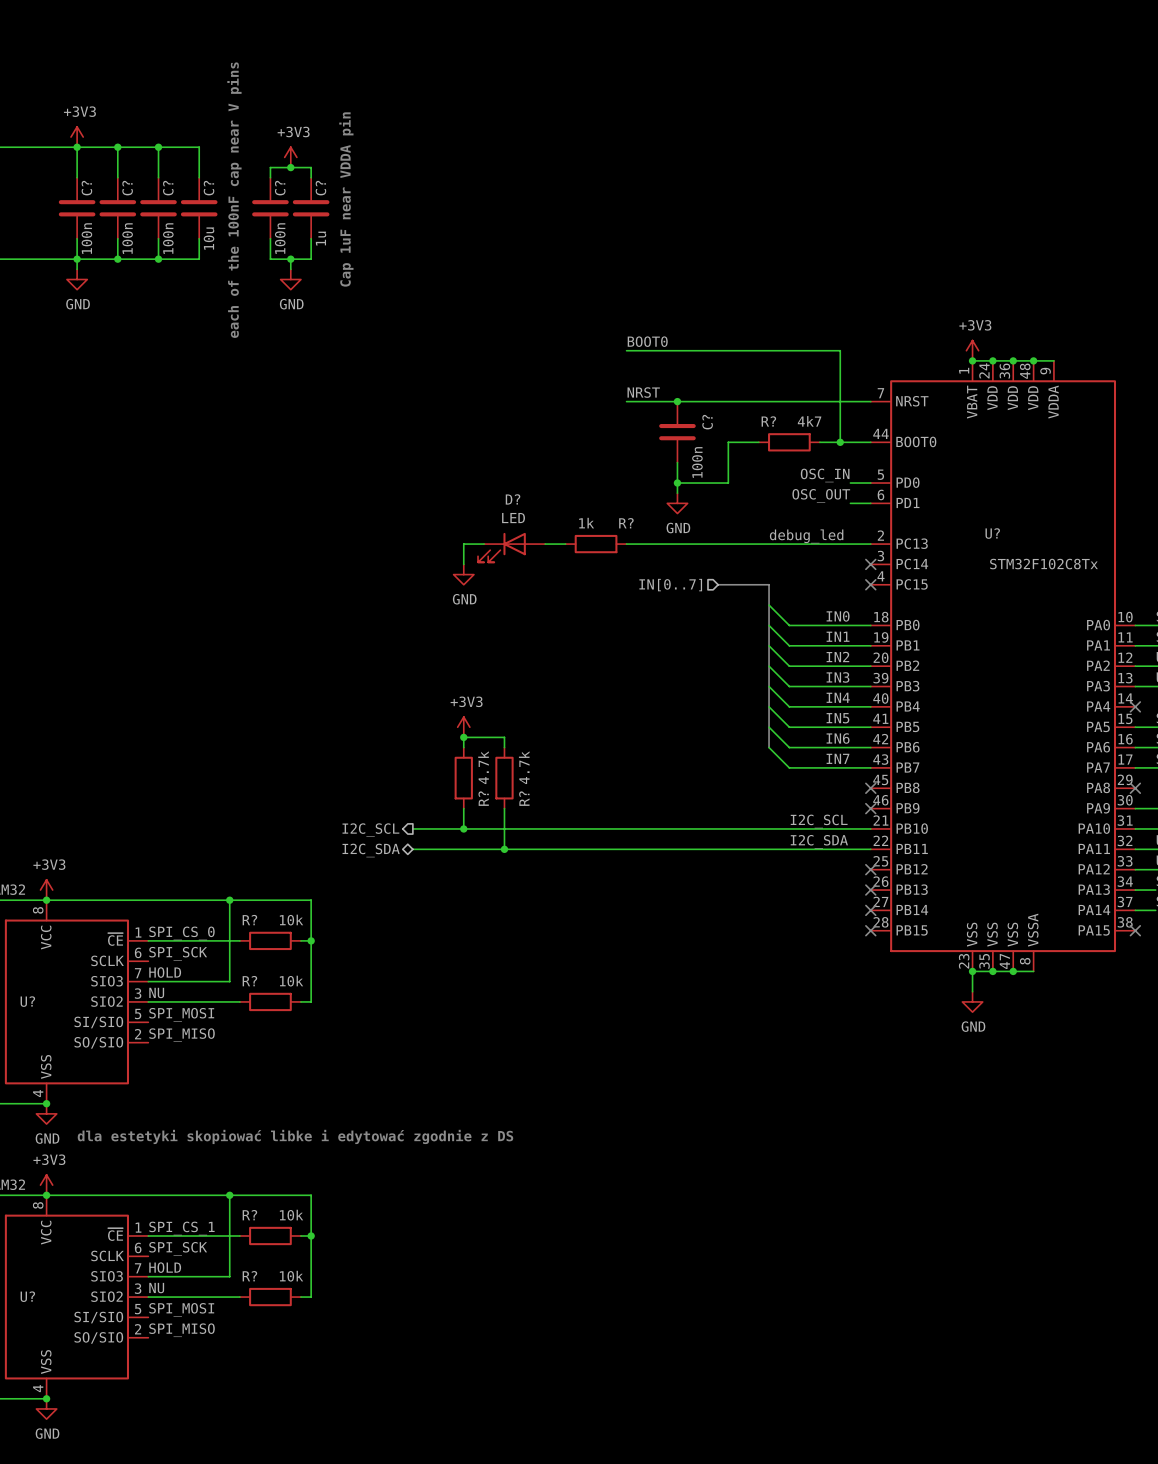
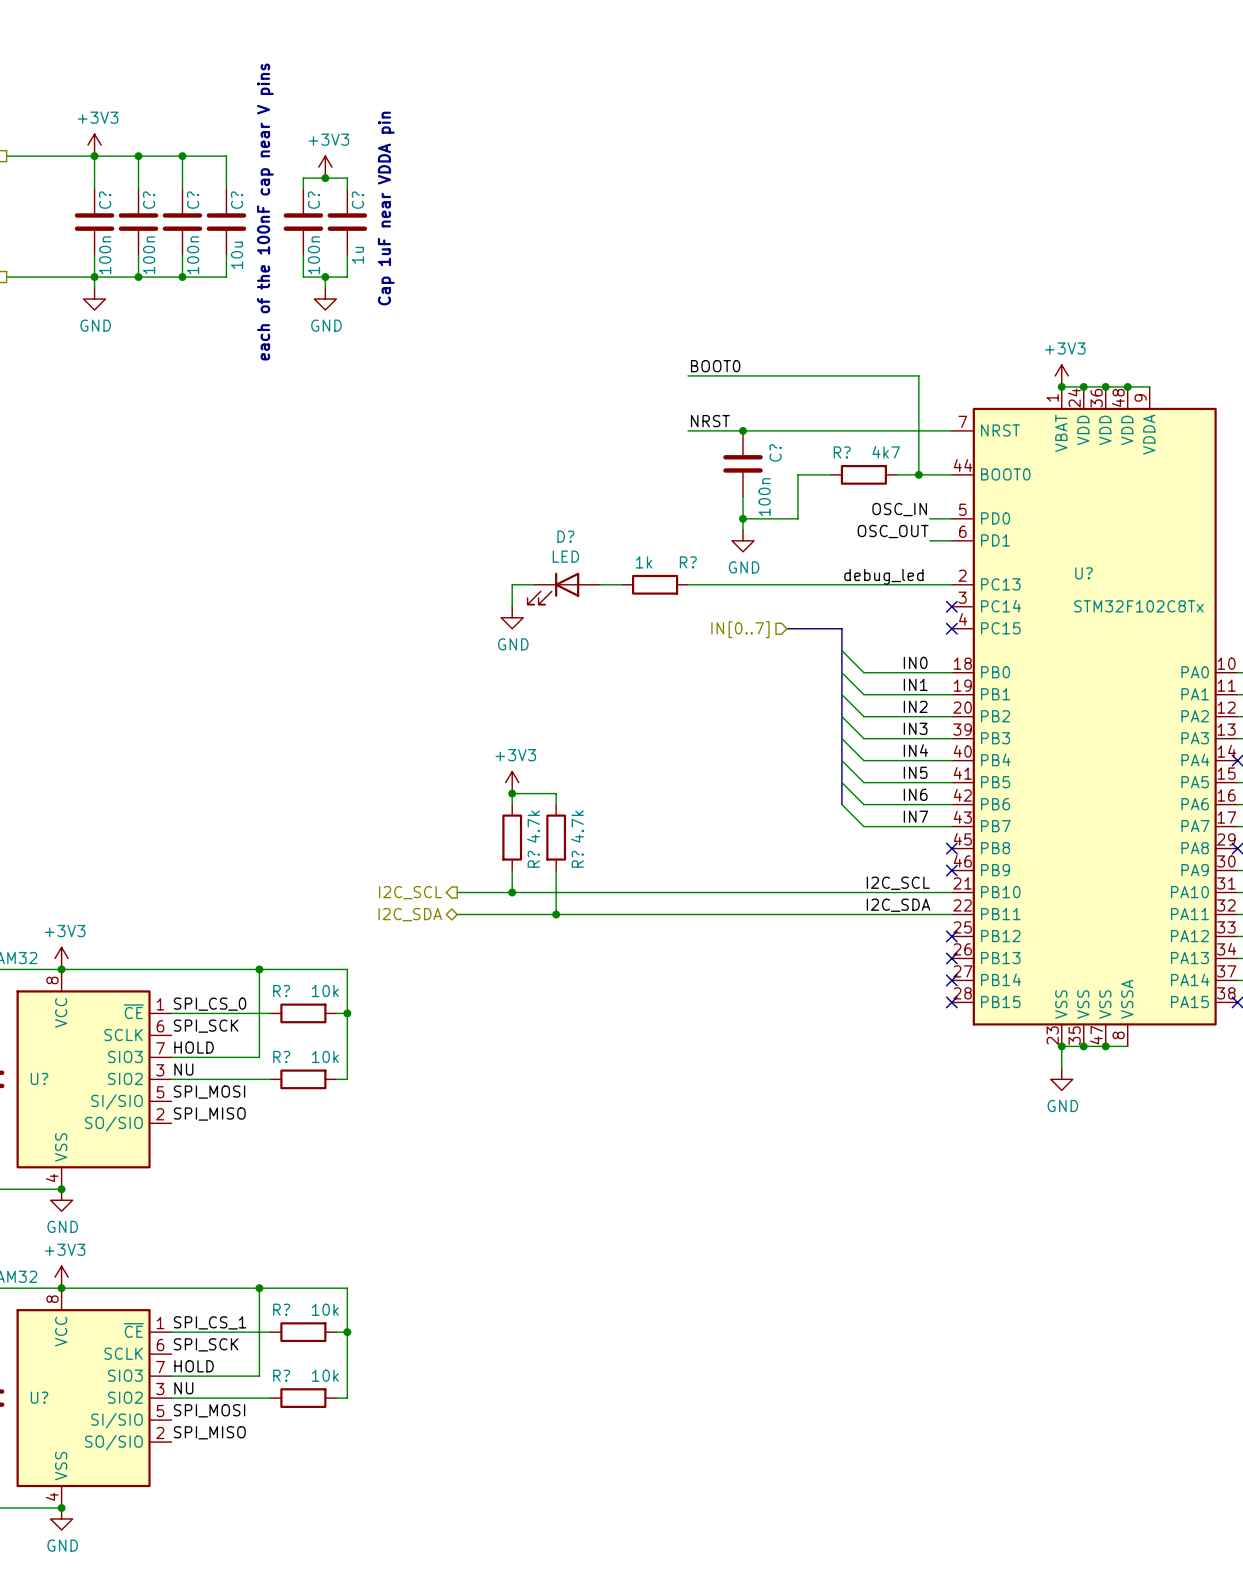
text: dla estetyki skopiować libke i edytować zgodnie z DS (295, 1136) -> none

